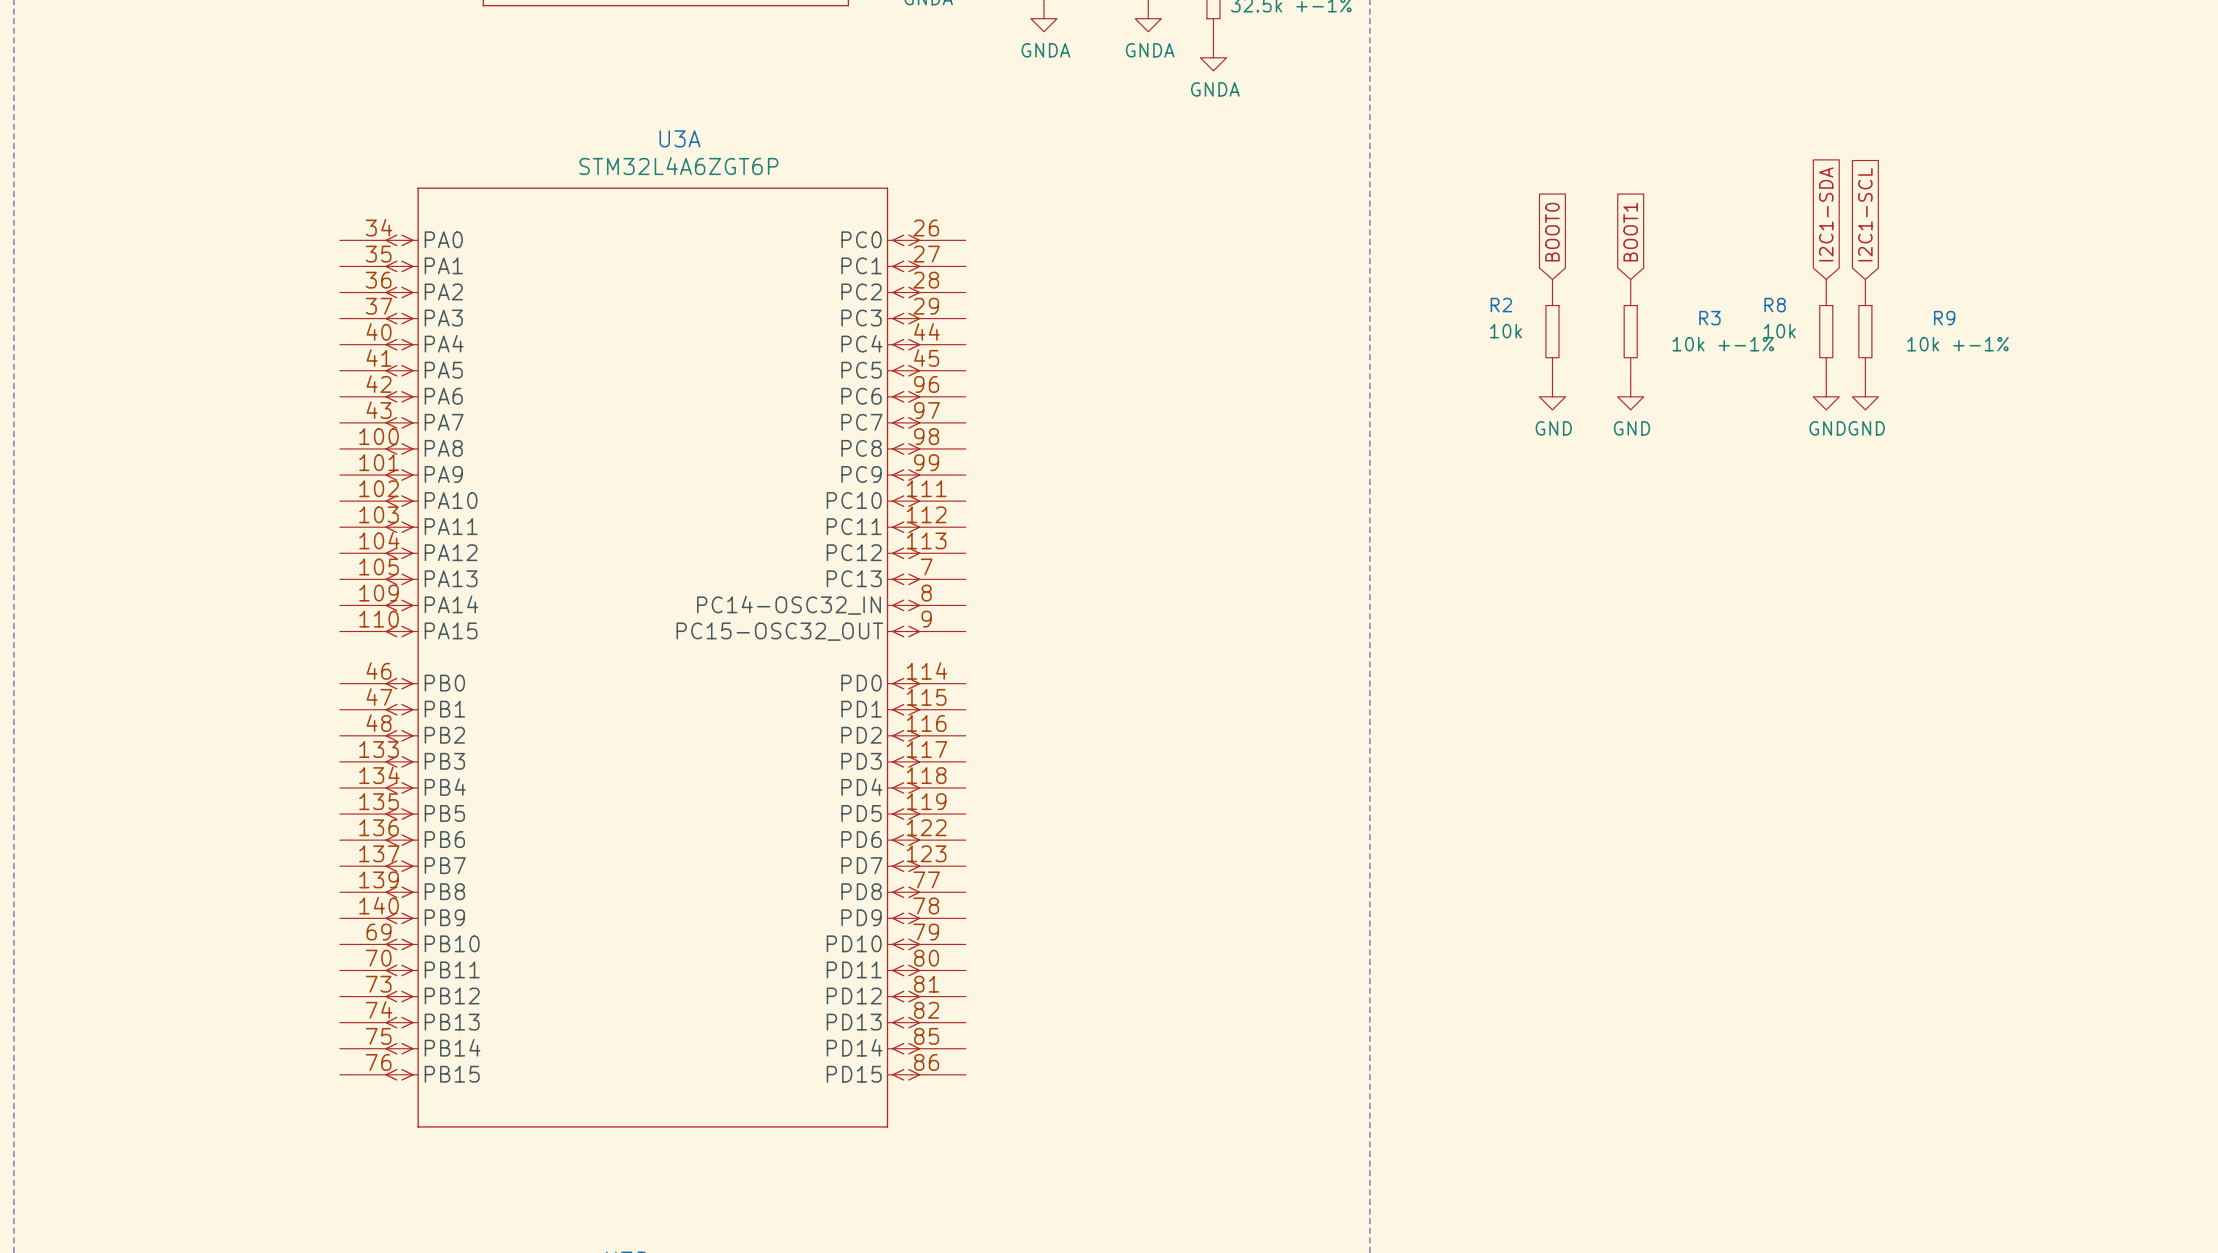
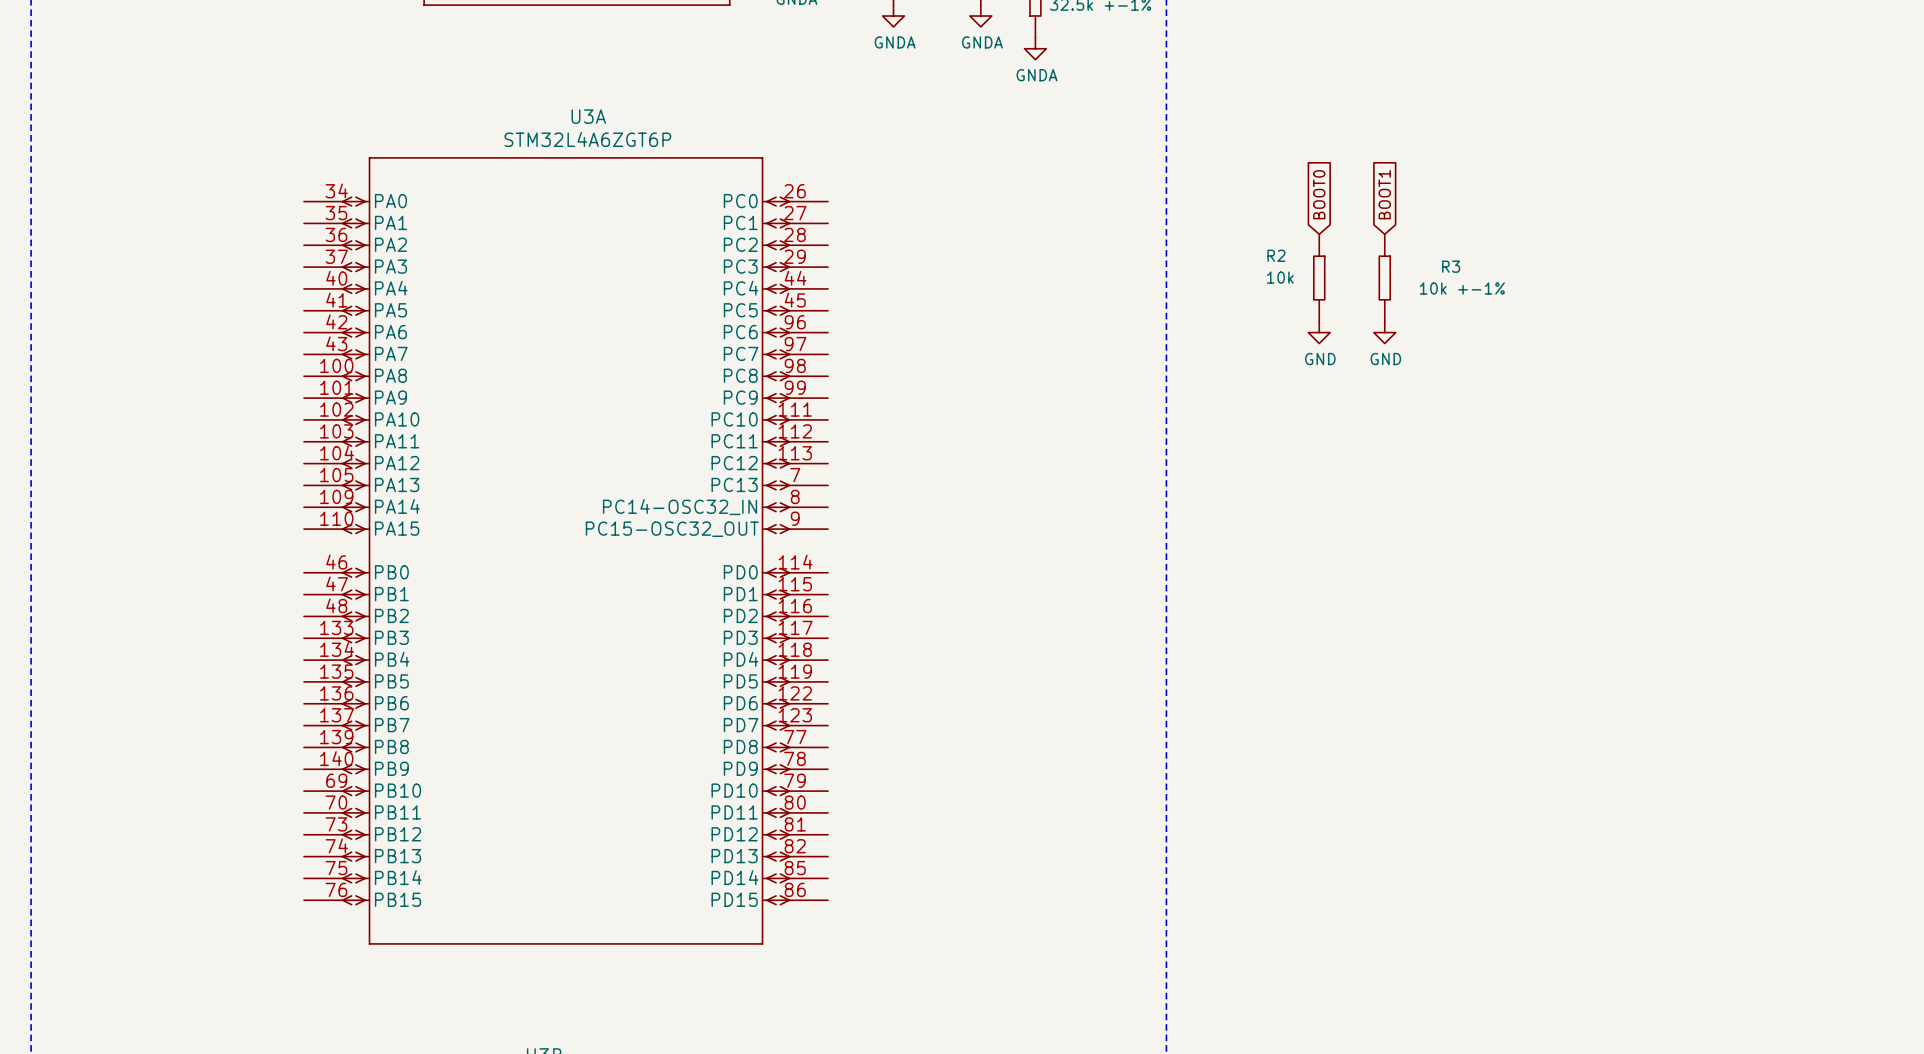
global label: I2C1-SDA (1826, 214) -> none
global label: I2C1-SCL (1865, 214) -> none
R8: 10k (1826, 331) -> none
R9: 10k +-1% (1865, 331) -> none
power symbol: GND (1826, 396) -> none
power symbol: GND (1865, 396) -> none

